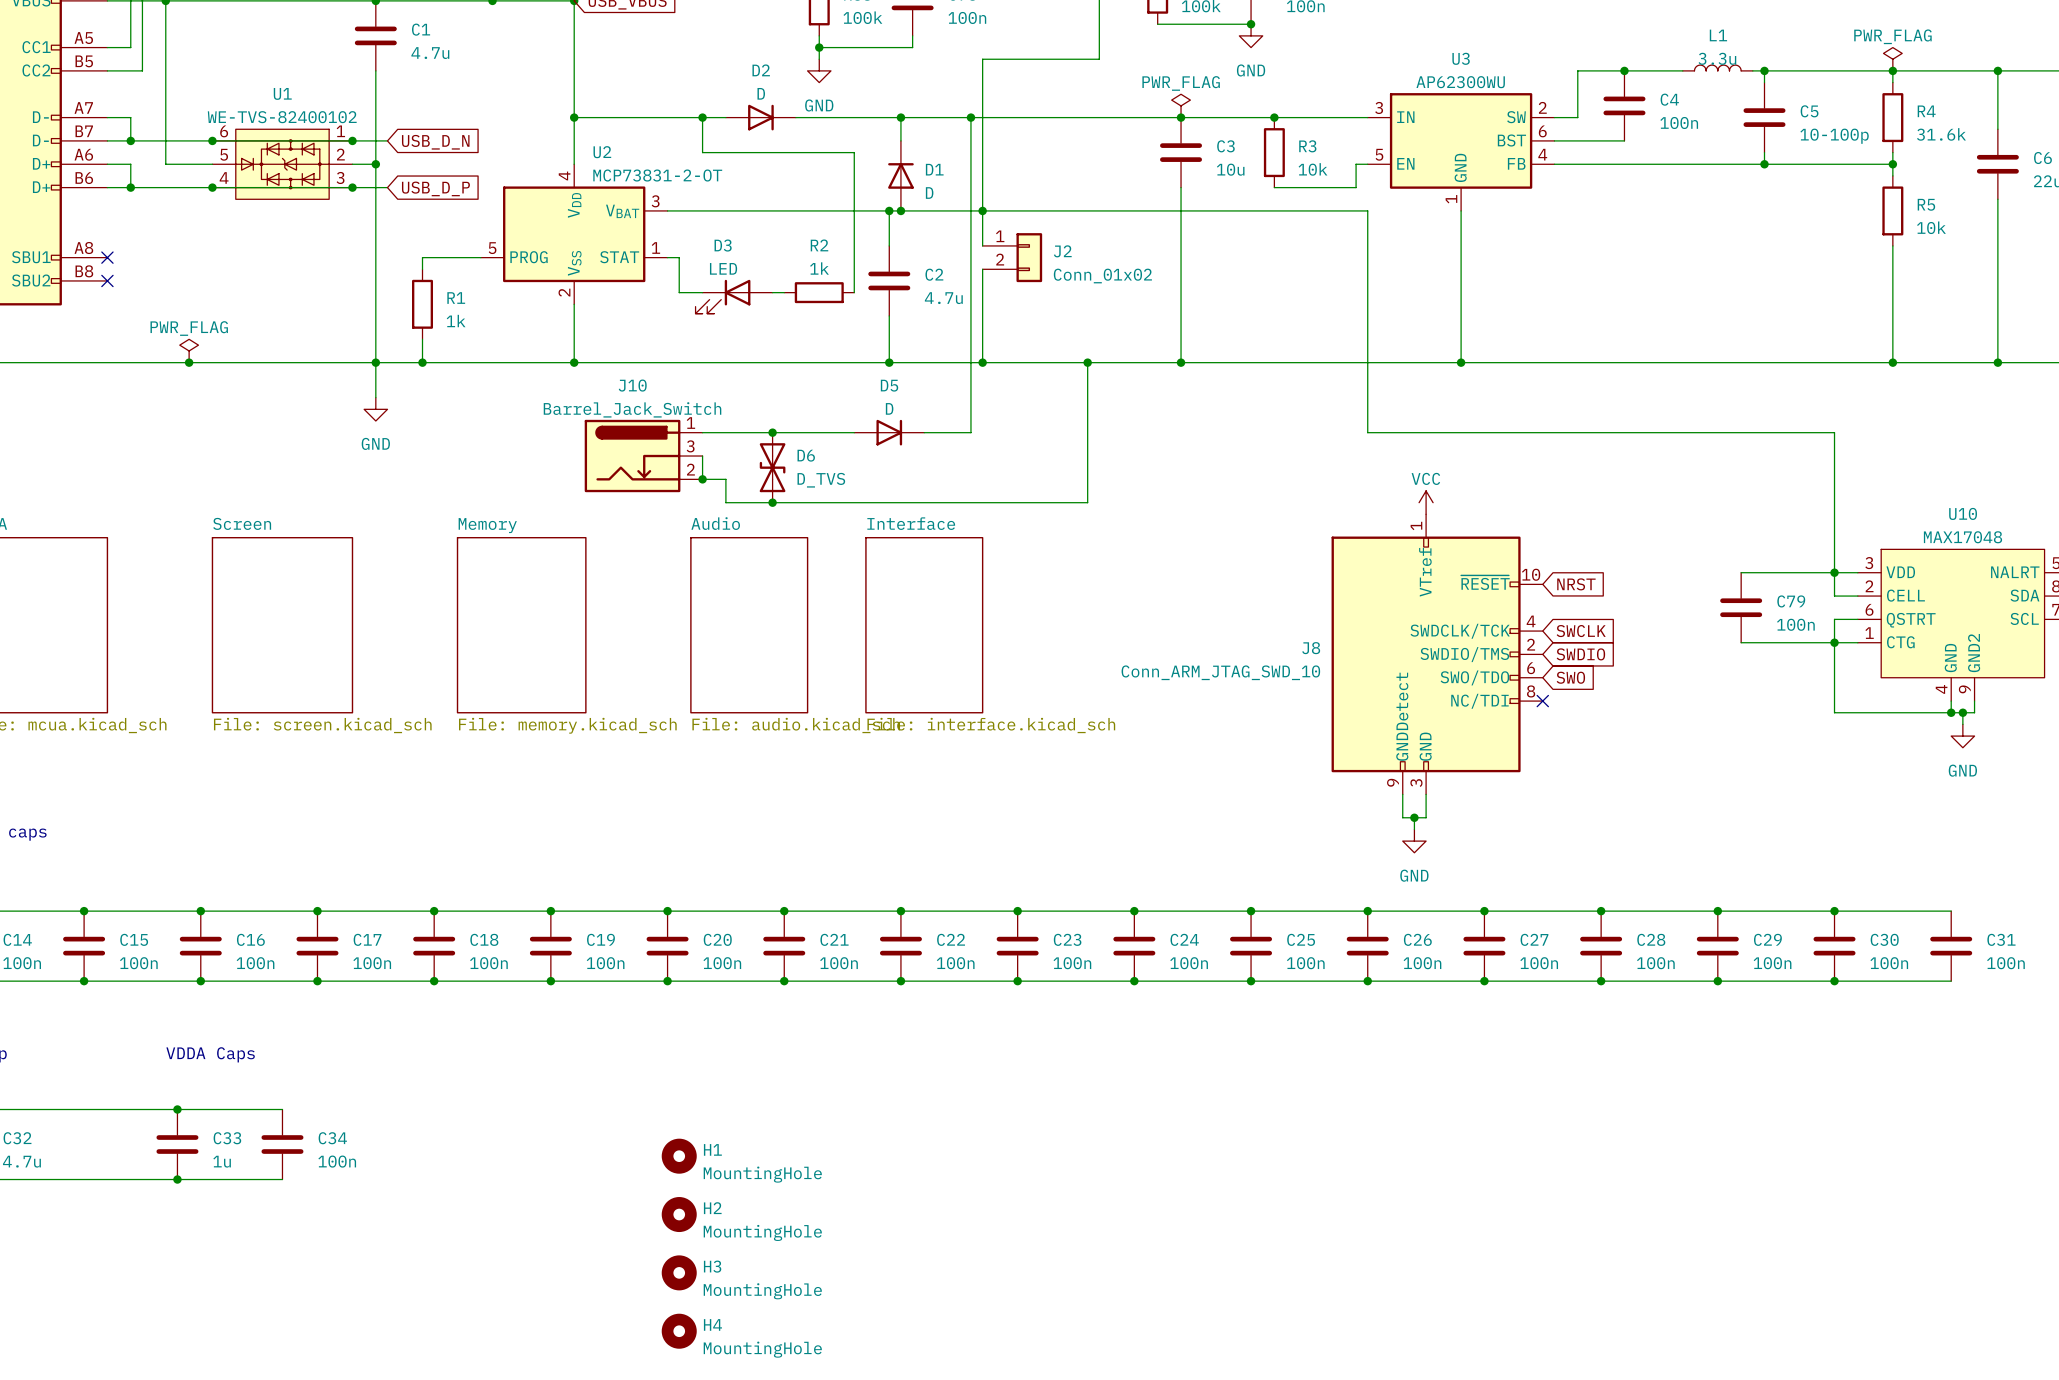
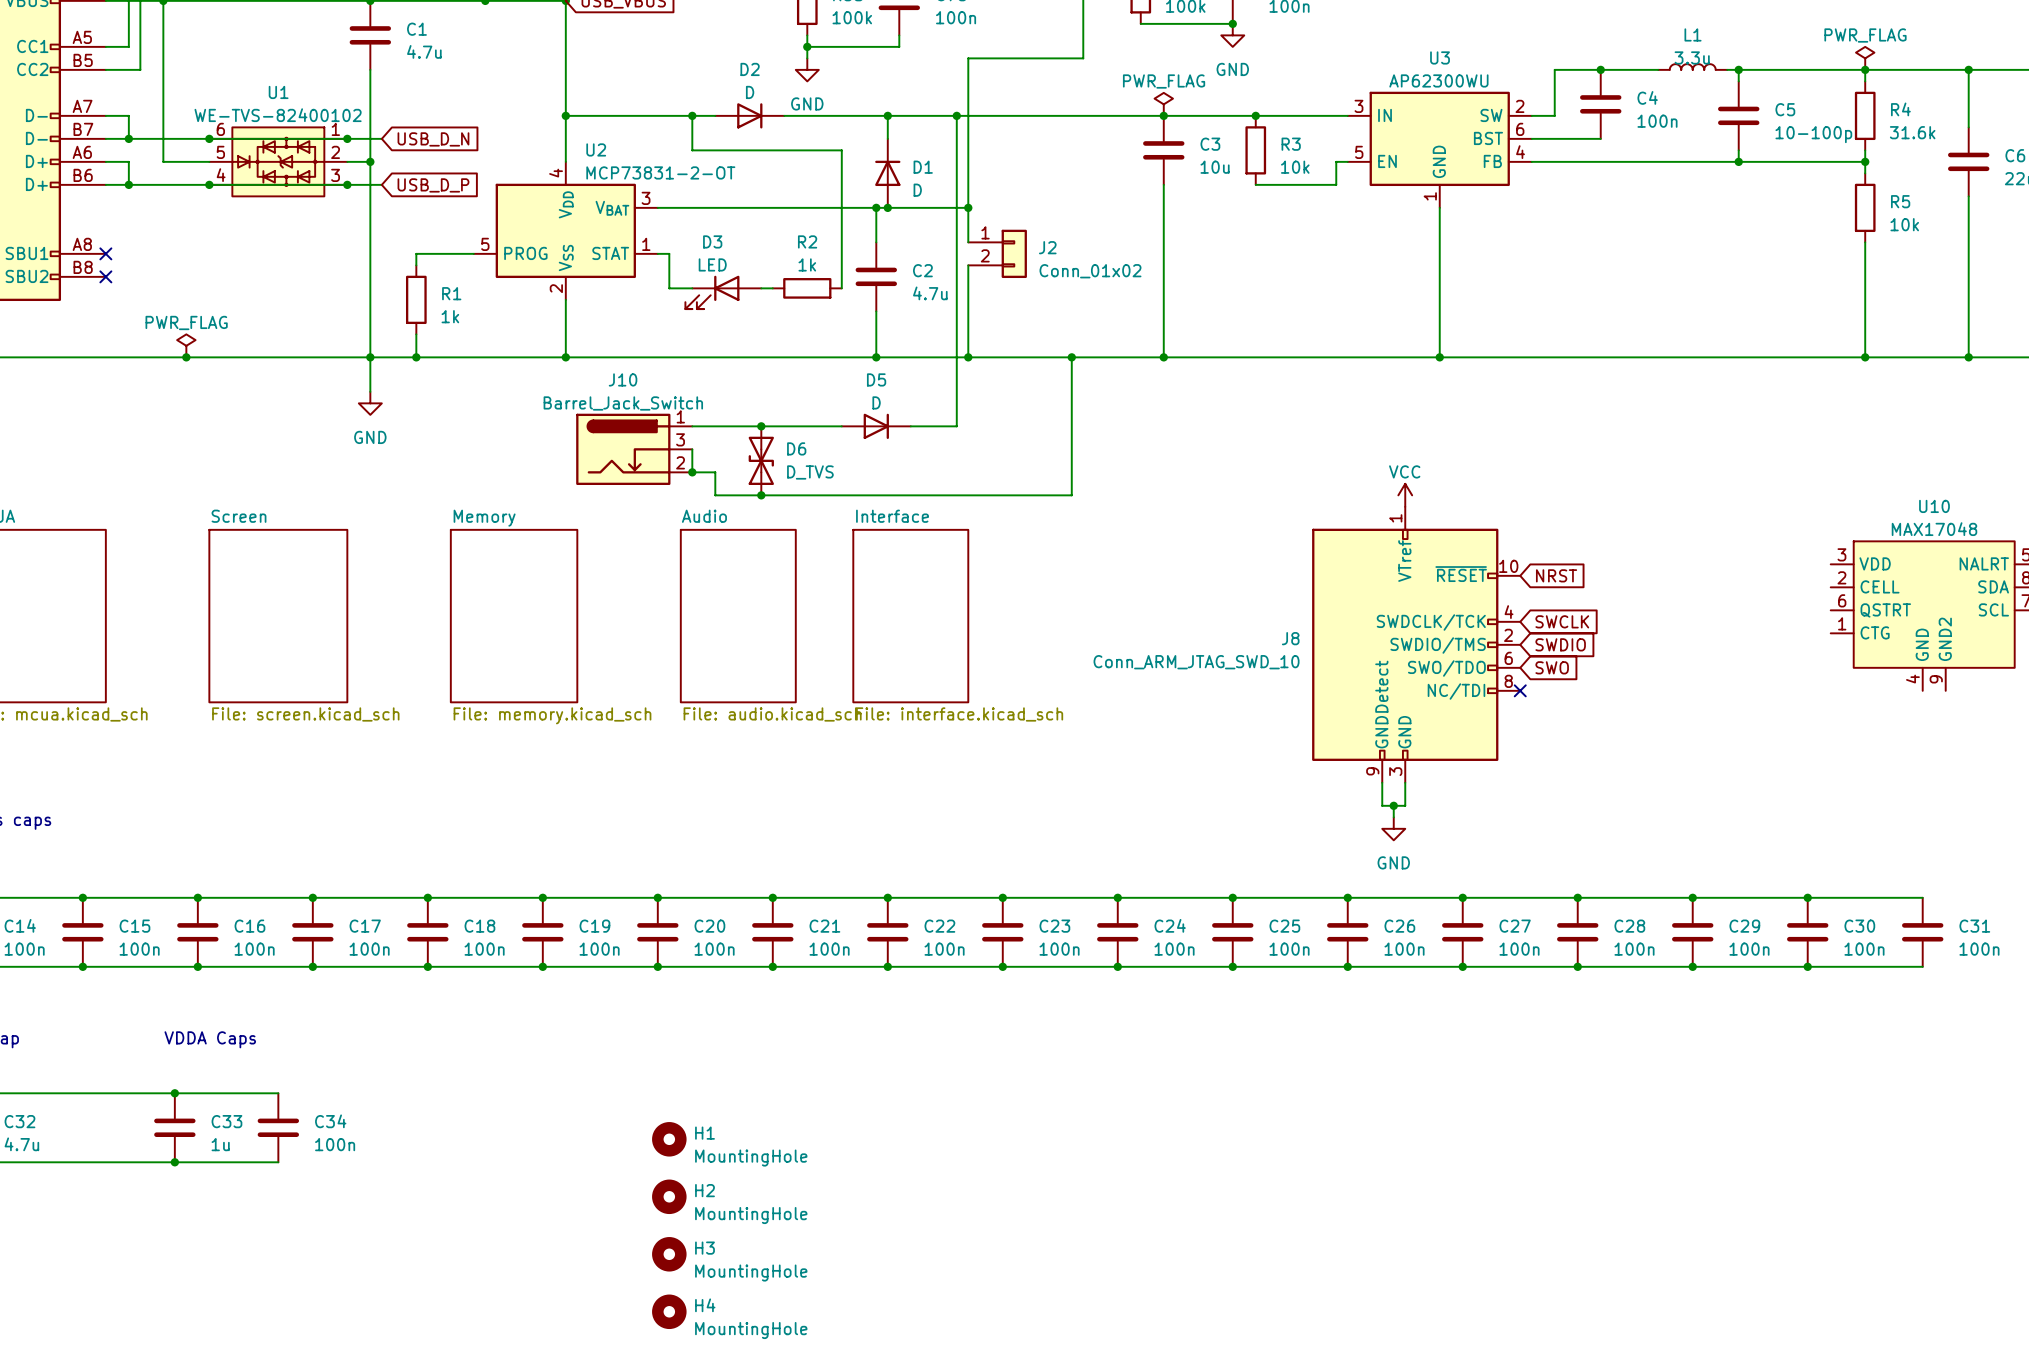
wire: (982, 210) (1367, 210) (1367, 432) (1834, 432) (1834, 596) (1857, 596) -> none
wire: (1741, 572) (1857, 572) -> none
junction: (1834, 572) -> none
C79: 100n (1741, 607) -> none
wire: (1857, 619) (1834, 619) (1834, 712) (1974, 712) (1974, 701) -> none
wire: (1741, 642) (1857, 642) -> none
junction: (1834, 642) -> none
wire: (1951, 701) (1951, 712) -> none
junction: (1951, 712) -> none
wire: (1962, 712) (1962, 724) -> none
junction: (1962, 712) -> none
power symbol: GND (1962, 736) -> none

